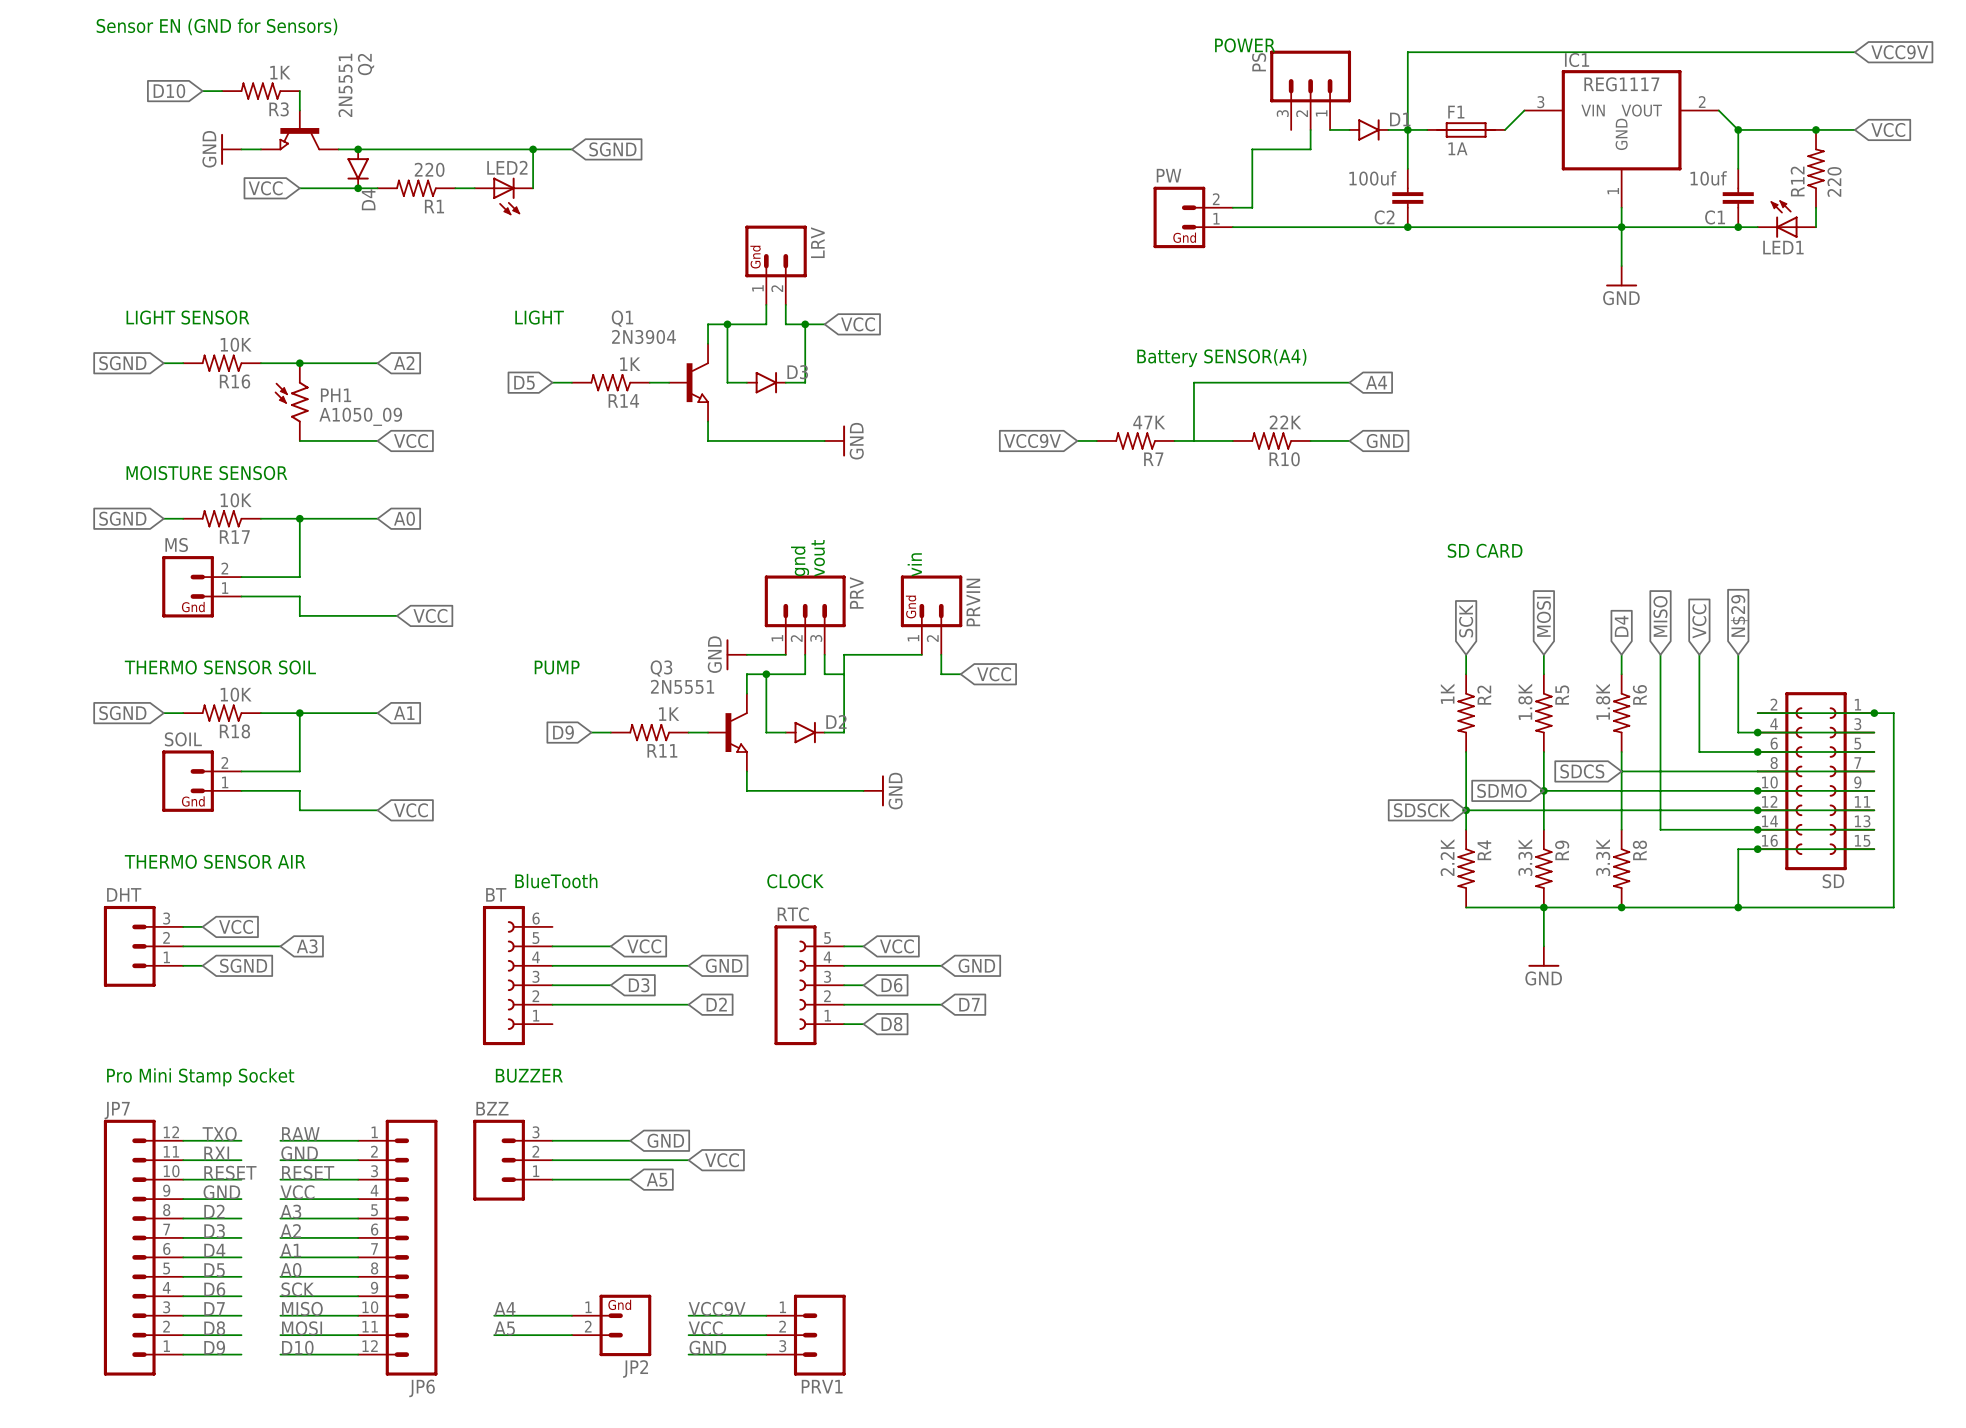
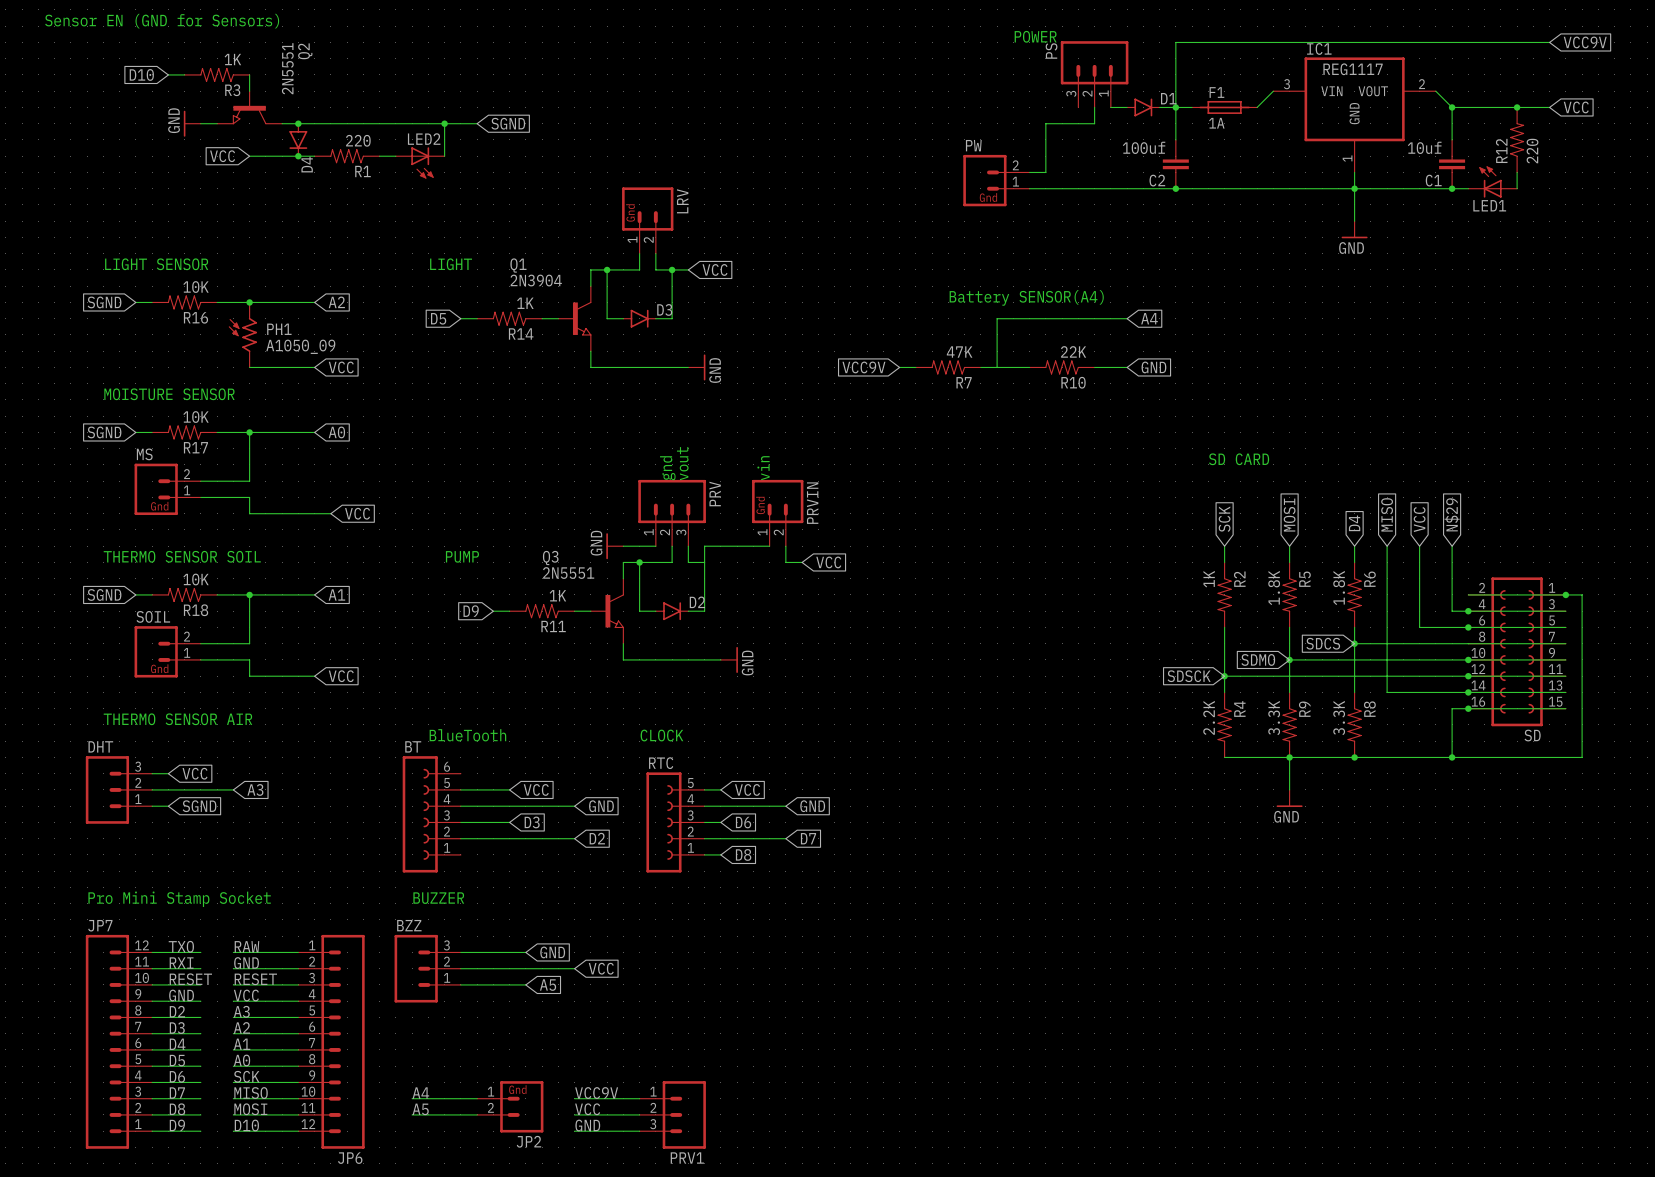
junction: none -> (1354, 643)

